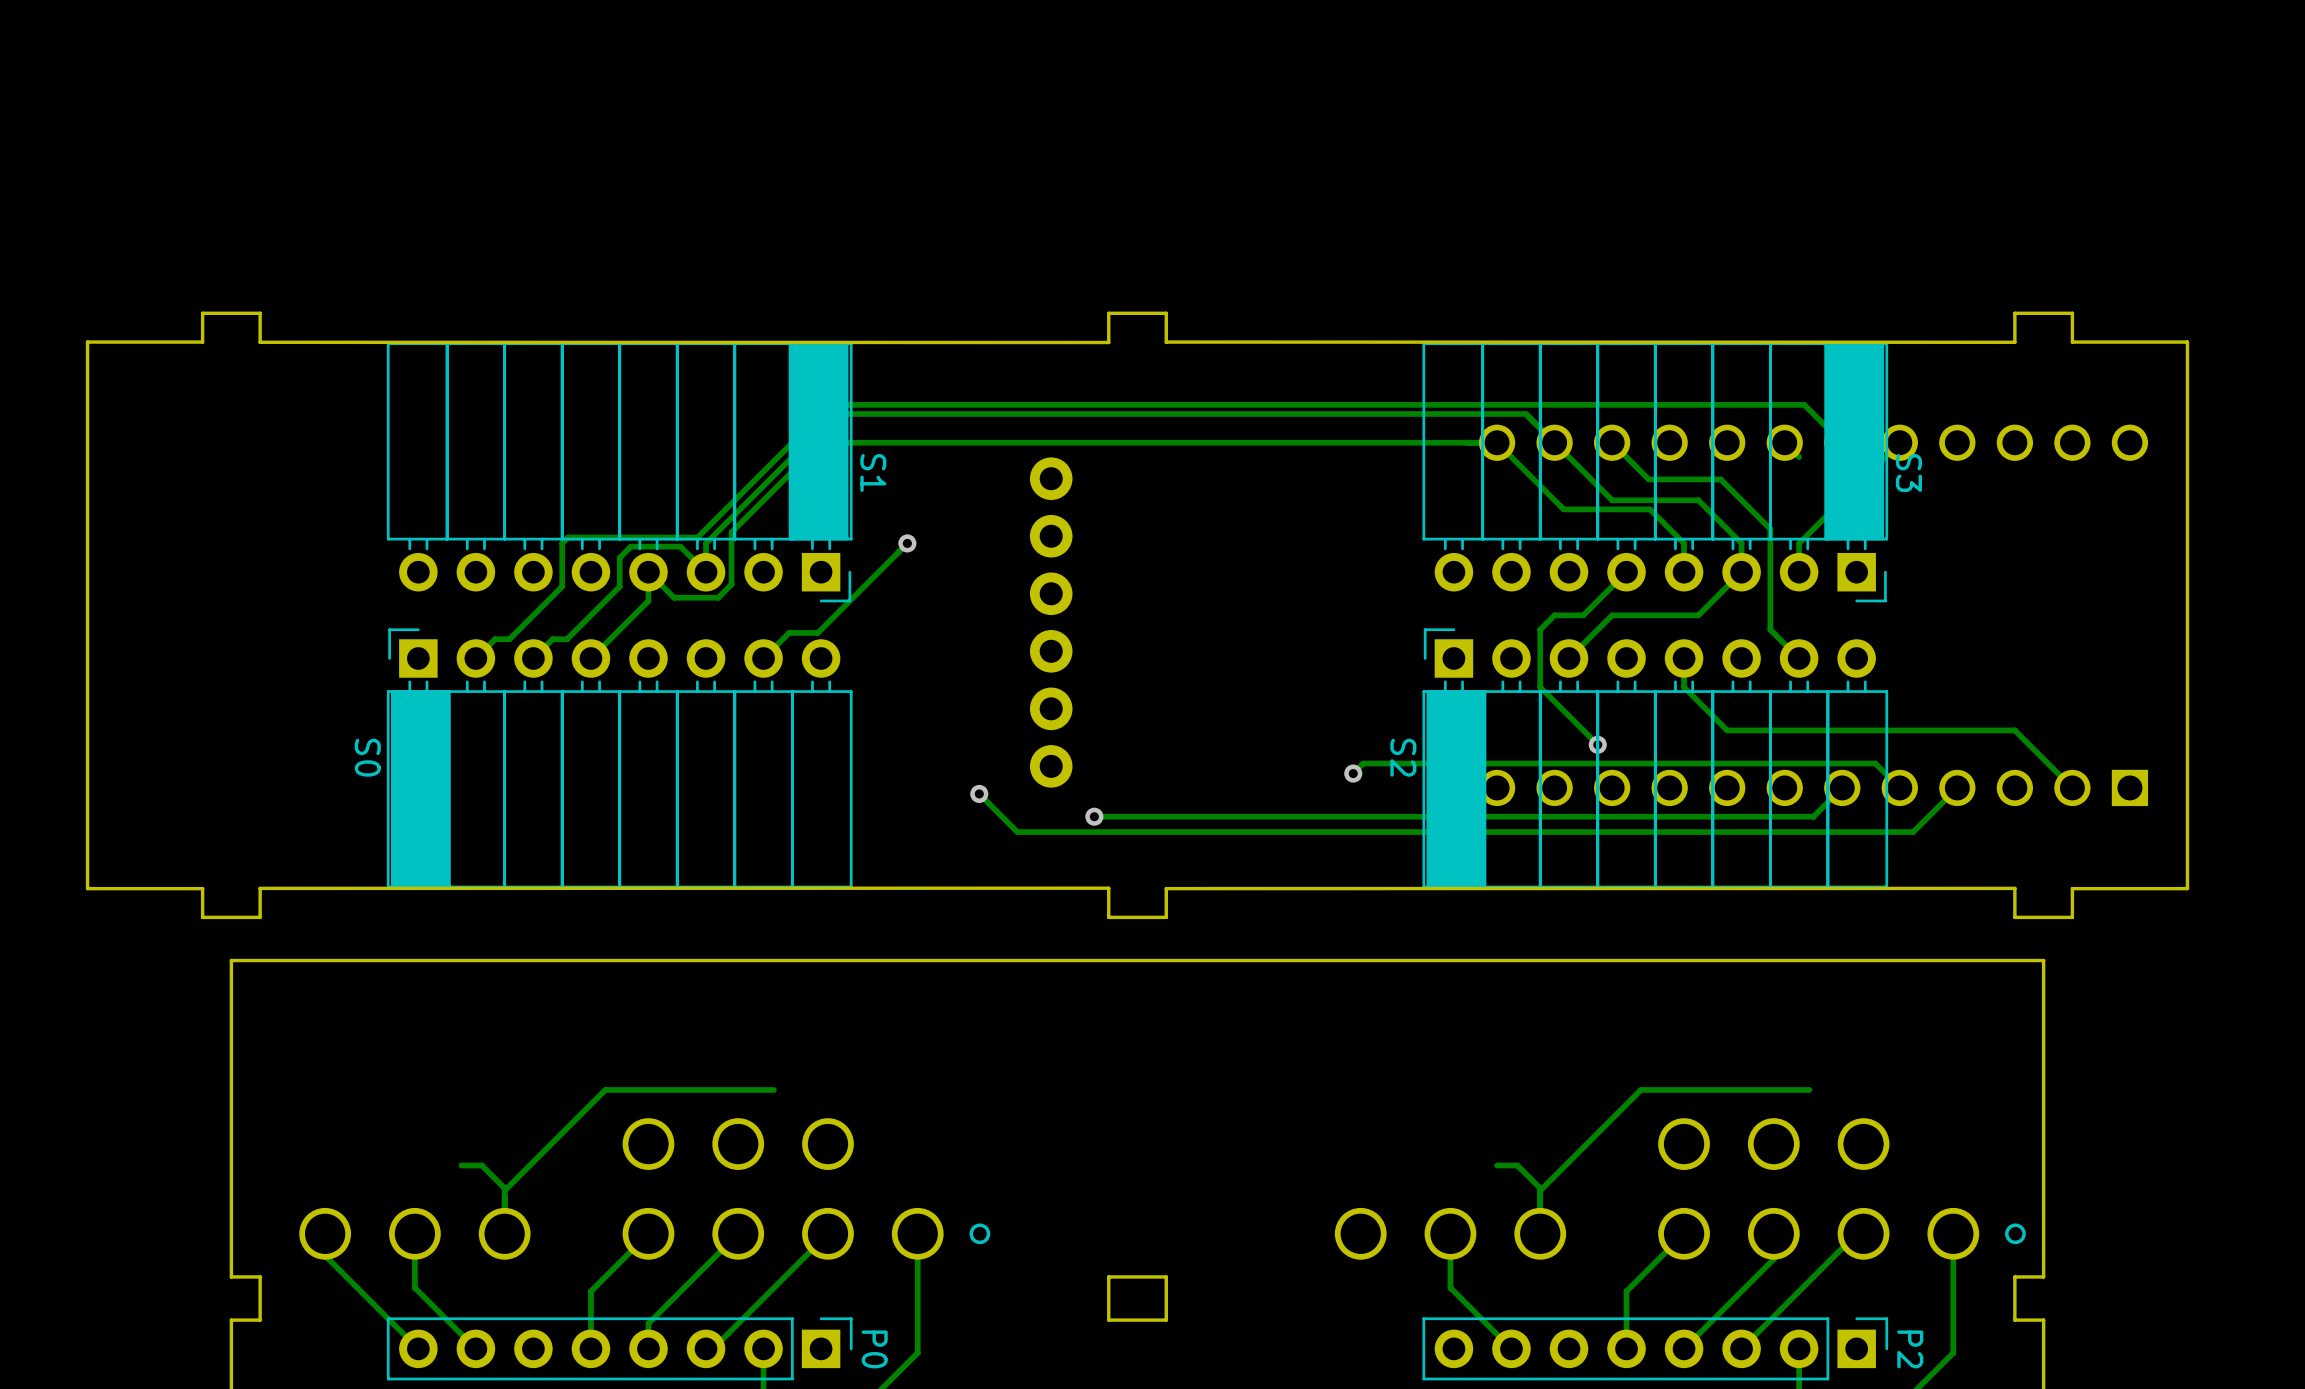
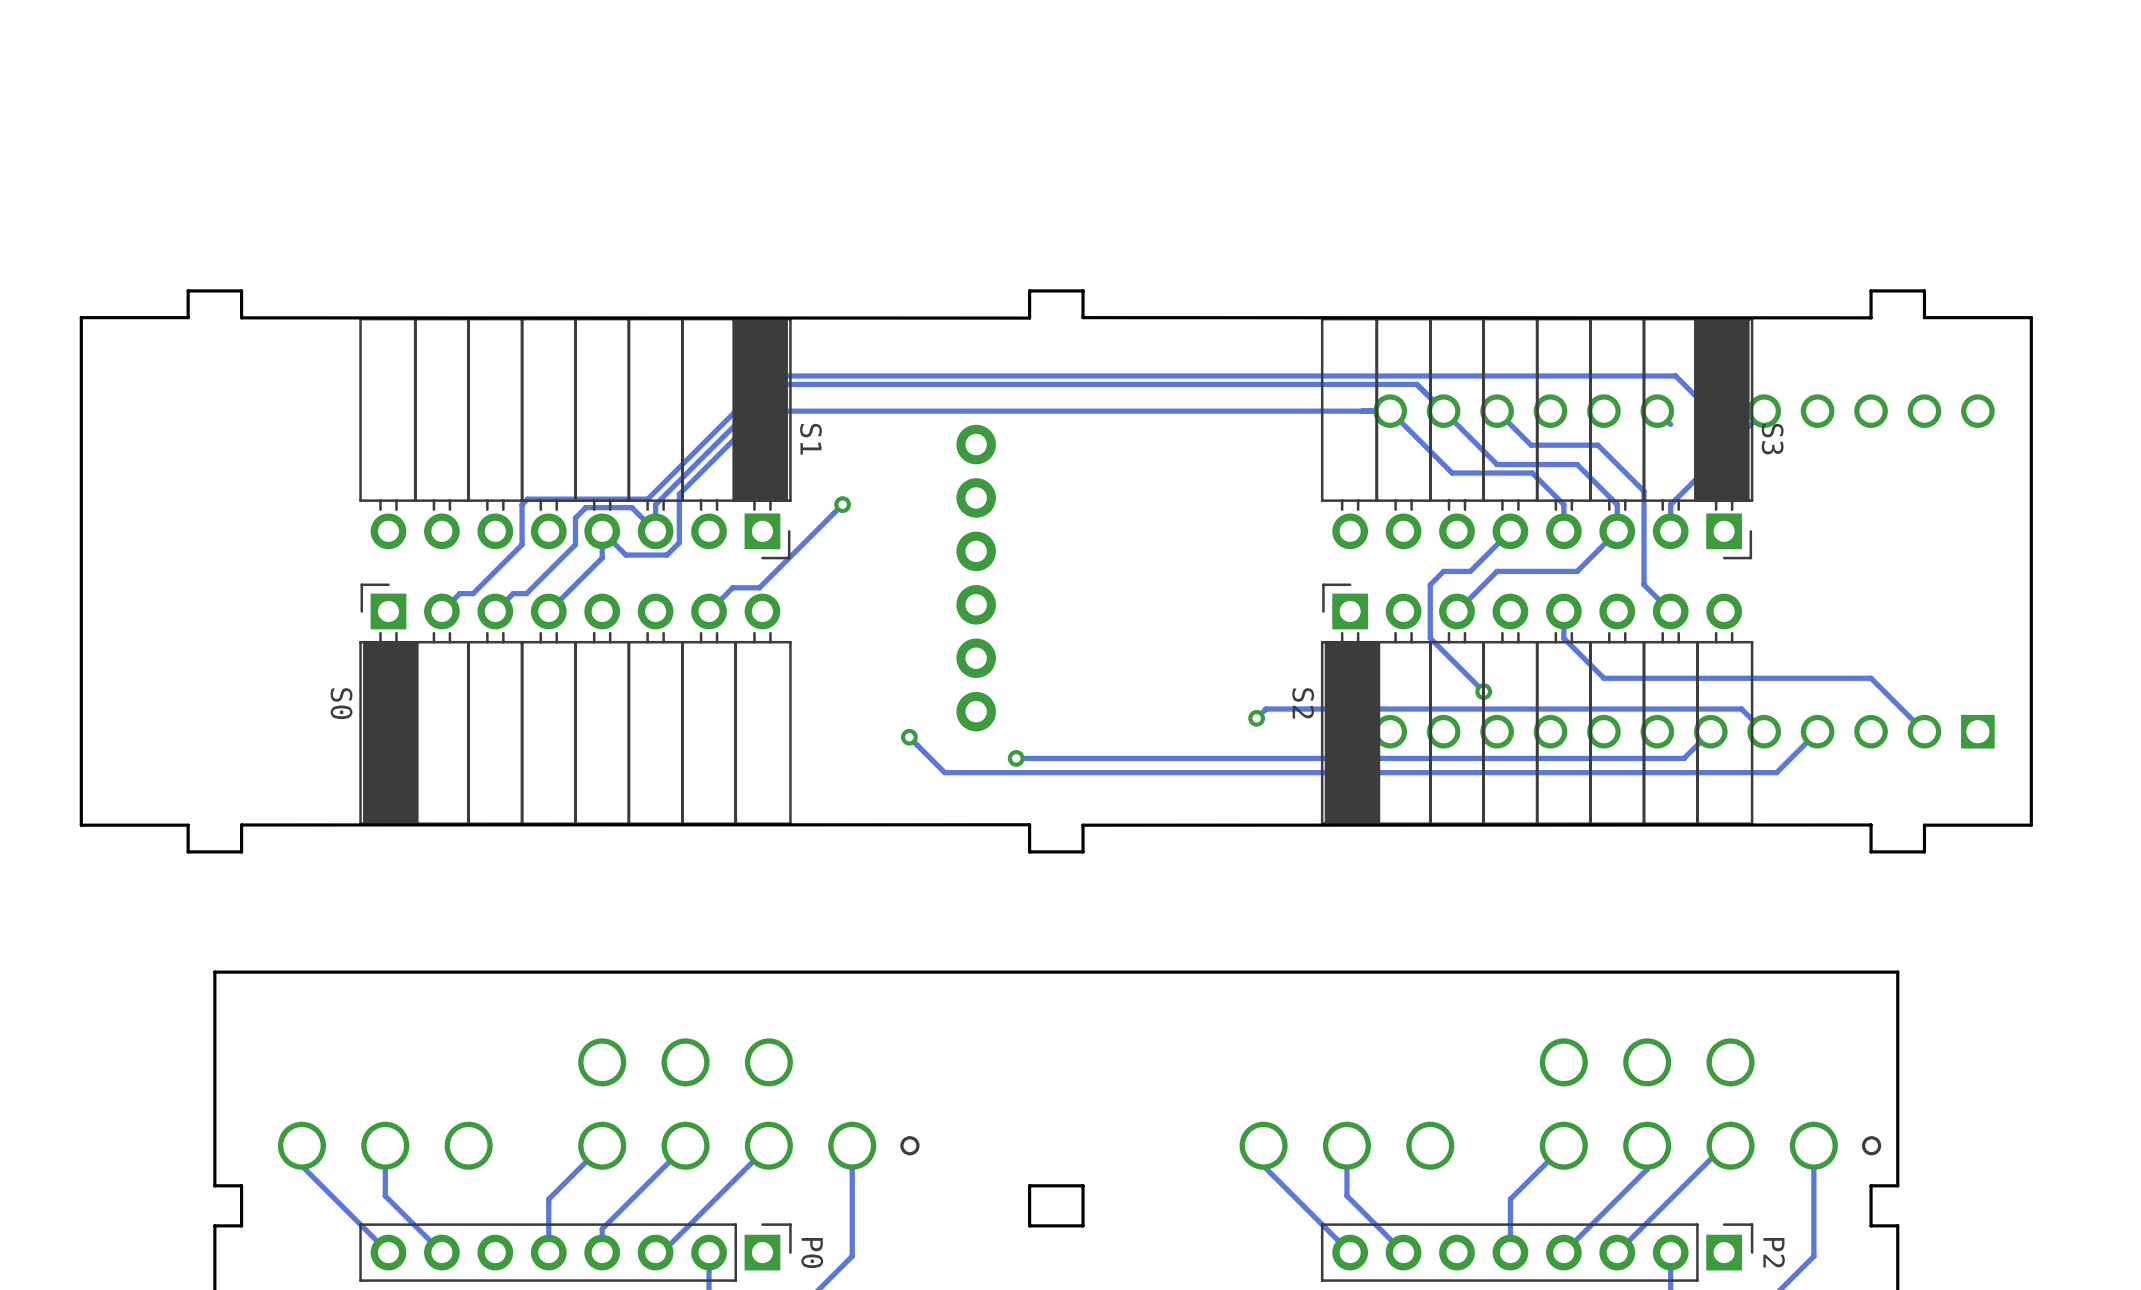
board edge: (2043, 1046) (2043, 960) (231, 960) (231, 1046) -> (1897, 972) (214, 972)
track: (773, 1089) (605, 1089) (504, 1190) (504, 1233) -> none
track: (1809, 1089) (1640, 1089) (1540, 1190) -> none
track: (461, 1165) (481, 1165) (504, 1188) -> none
track: (1497, 1165) (1517, 1165) (1540, 1188) (1540, 1233) -> none
track: none -> (1263, 1166) (1350, 1252)

